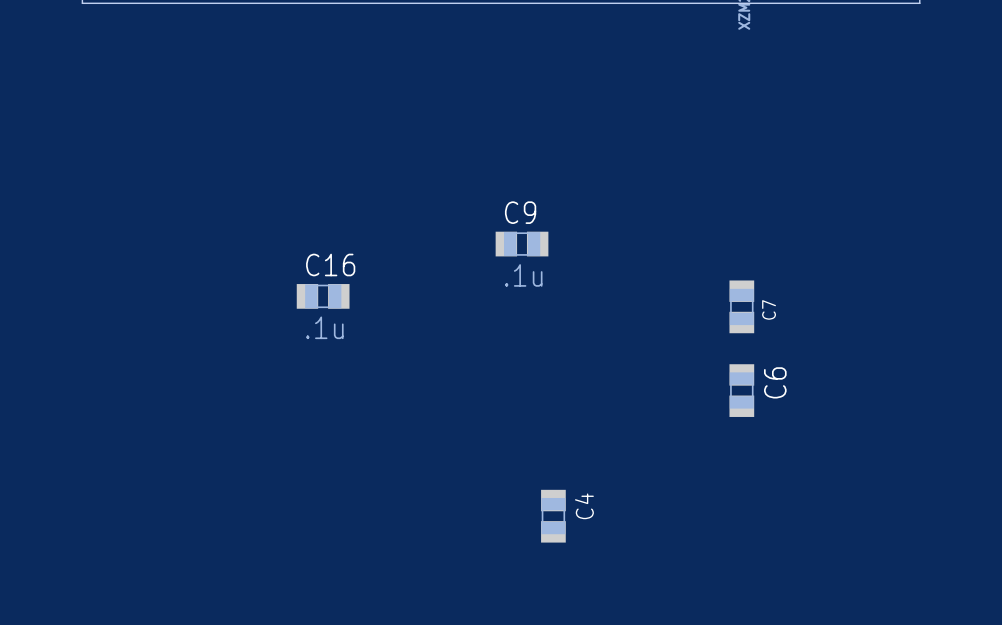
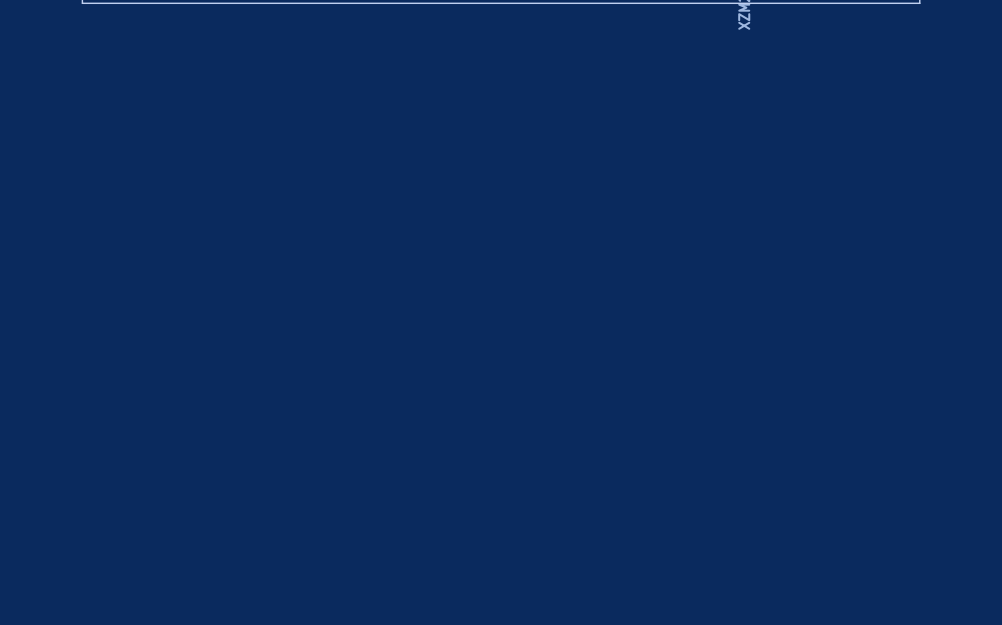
C9: .1u (522, 244) -> none
C16: .1u (323, 296) -> none
C7: (741, 306) -> none
C6: (741, 390) -> none
C4: (553, 516) -> none

